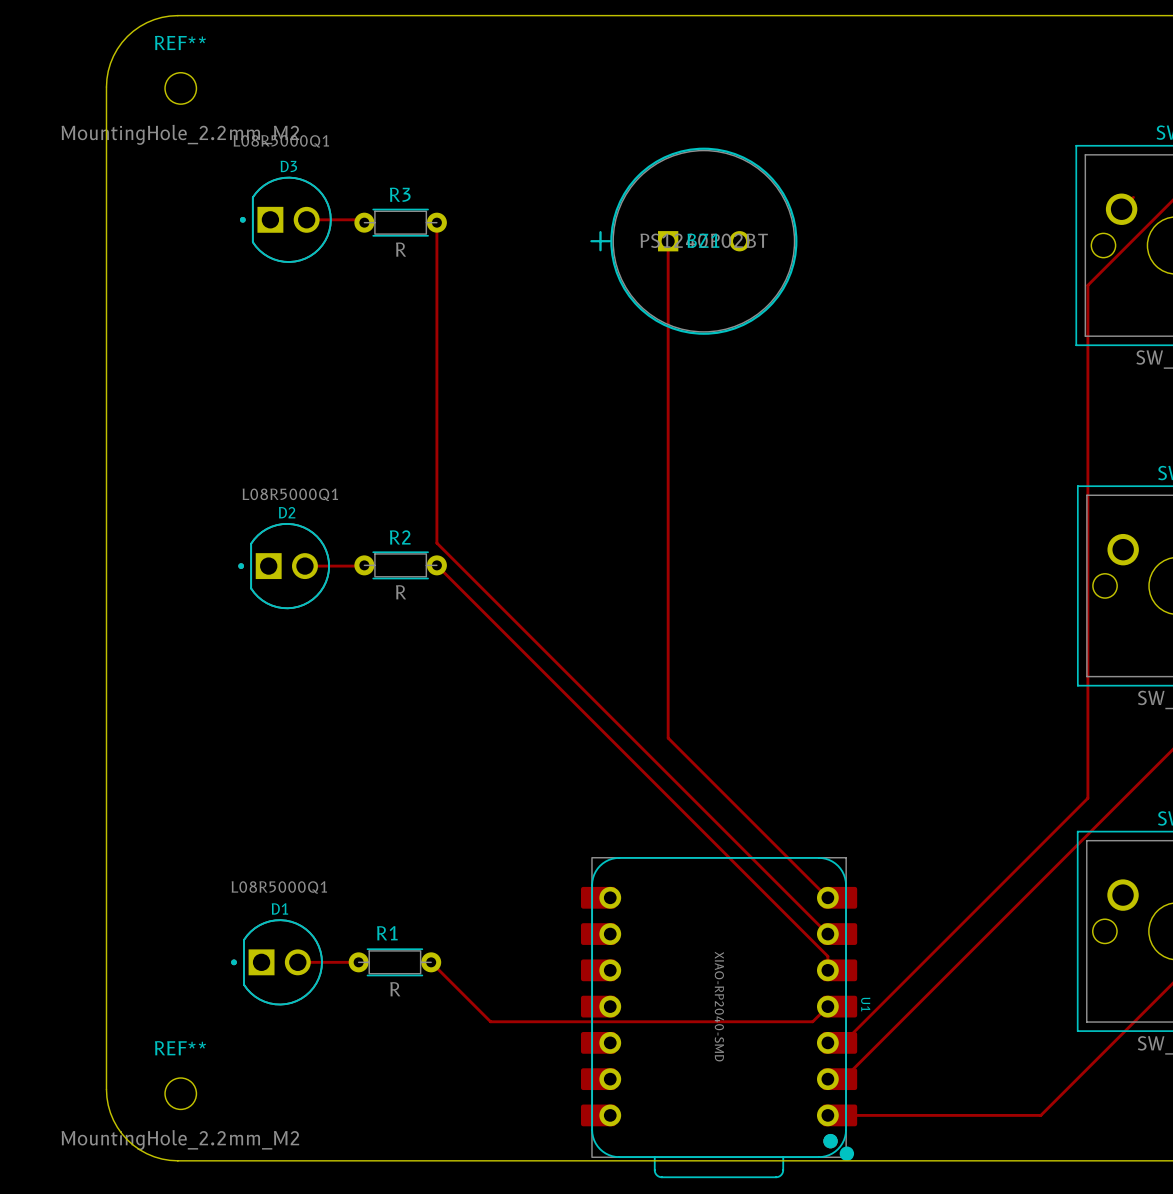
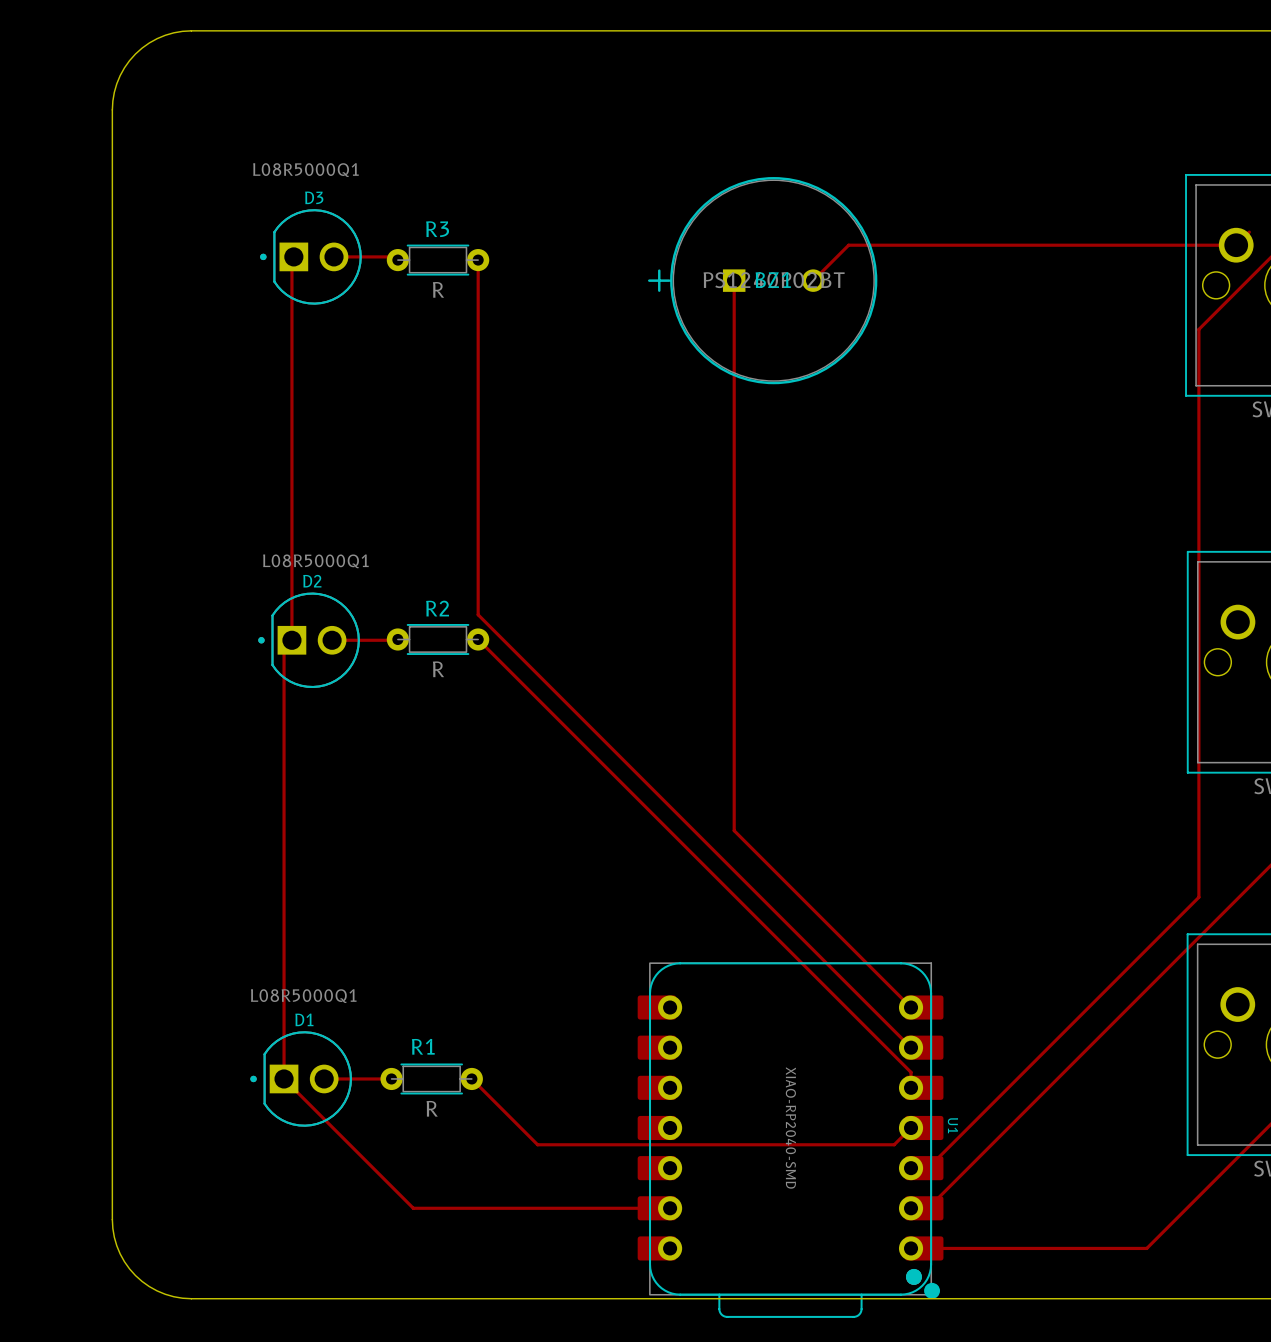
REF**: MountingHole_2.2mm_M2 (180, 88) -> none
track: none -> (1236, 245) (848, 245) (813, 280)
track: none -> (291, 258) (291, 640)
track: none -> (284, 648) (284, 1078) (413, 1208) (656, 1208)
REF**: MountingHole_2.2mm_M2 (180, 1093) -> none

